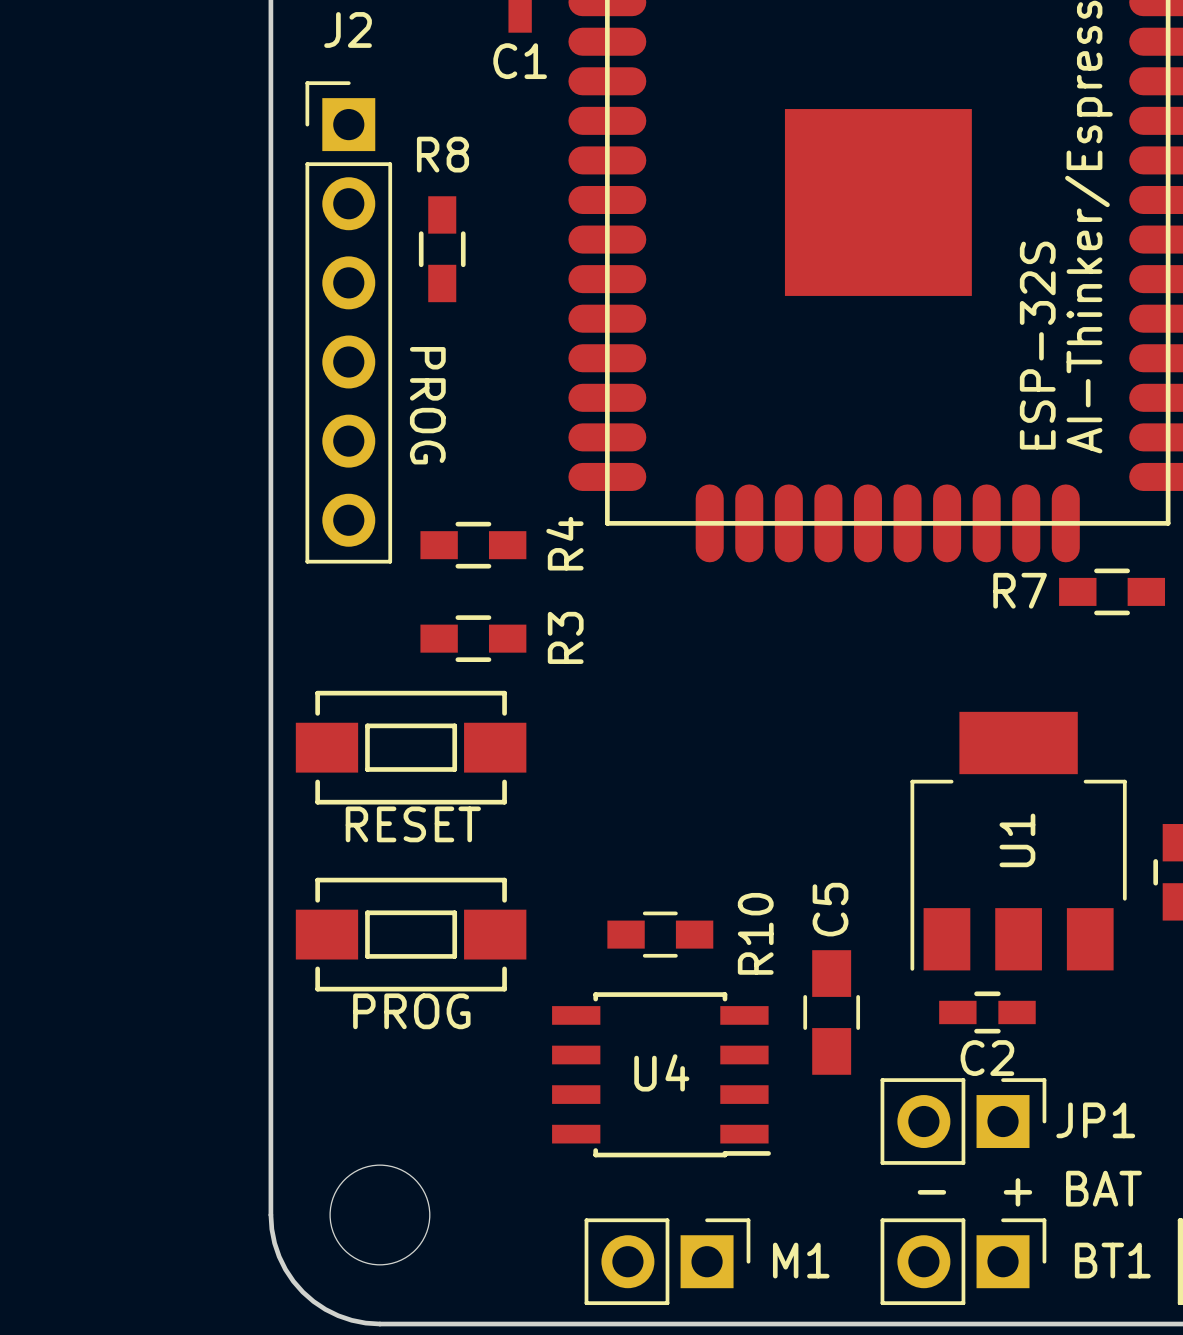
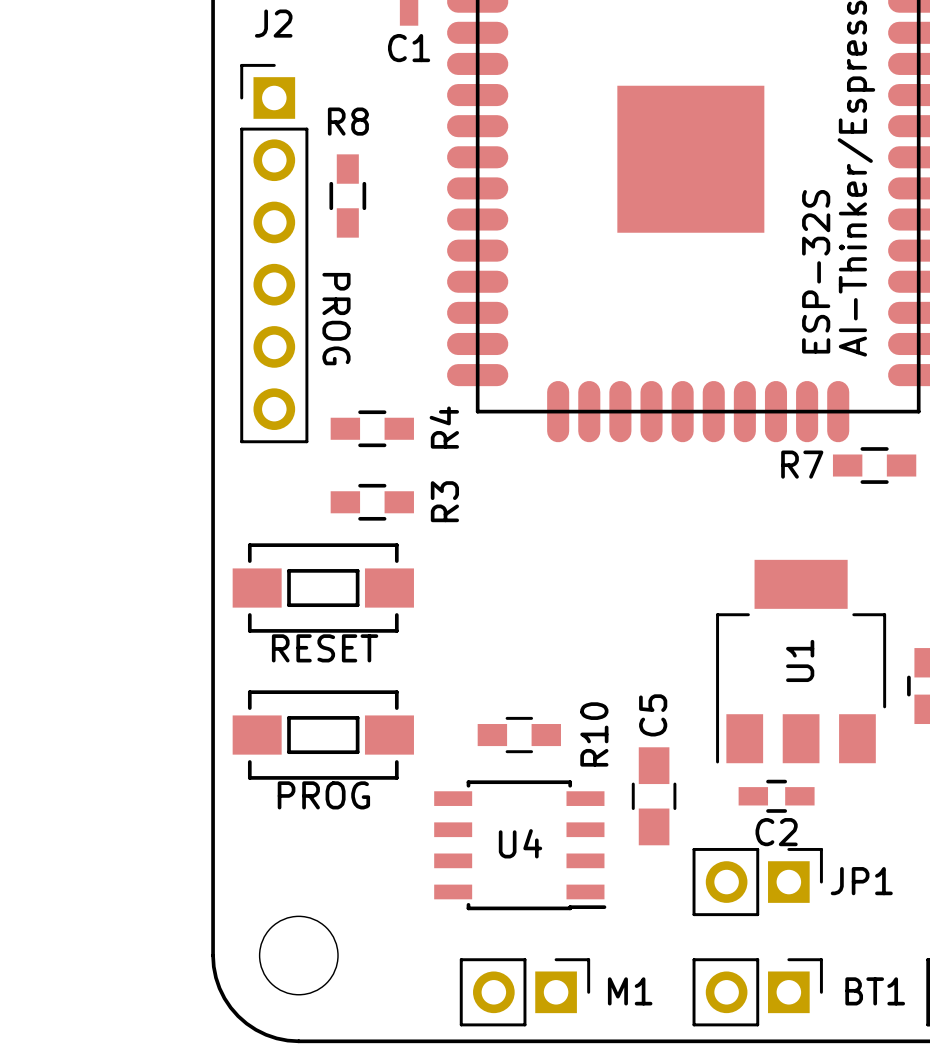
text: - + BAT (1029, 1188) -> none

